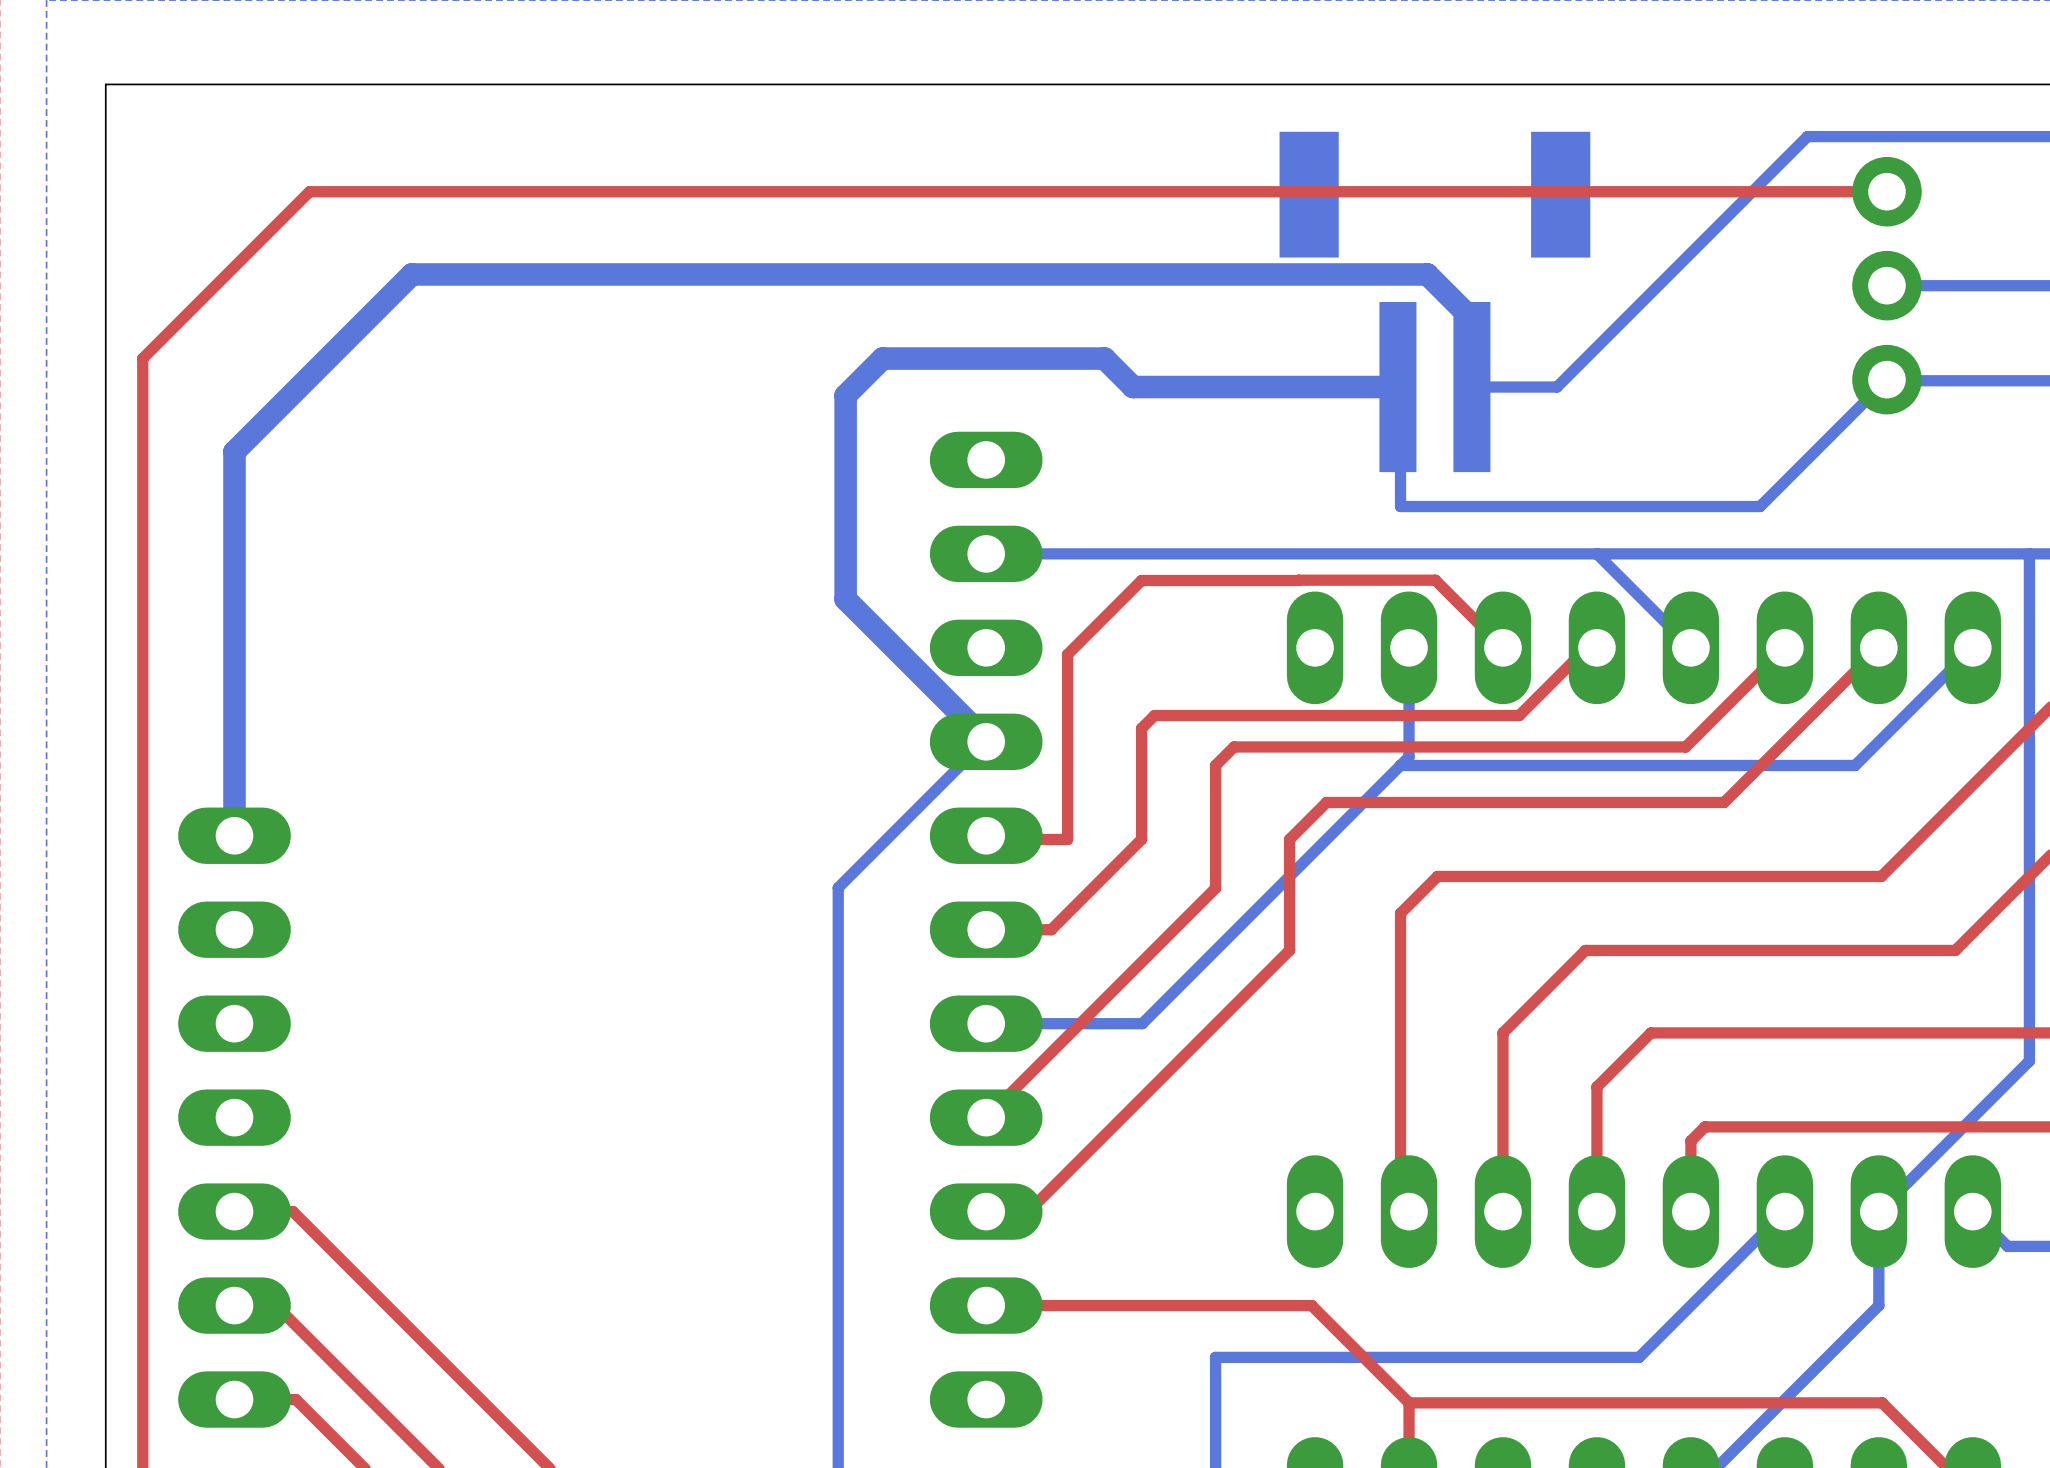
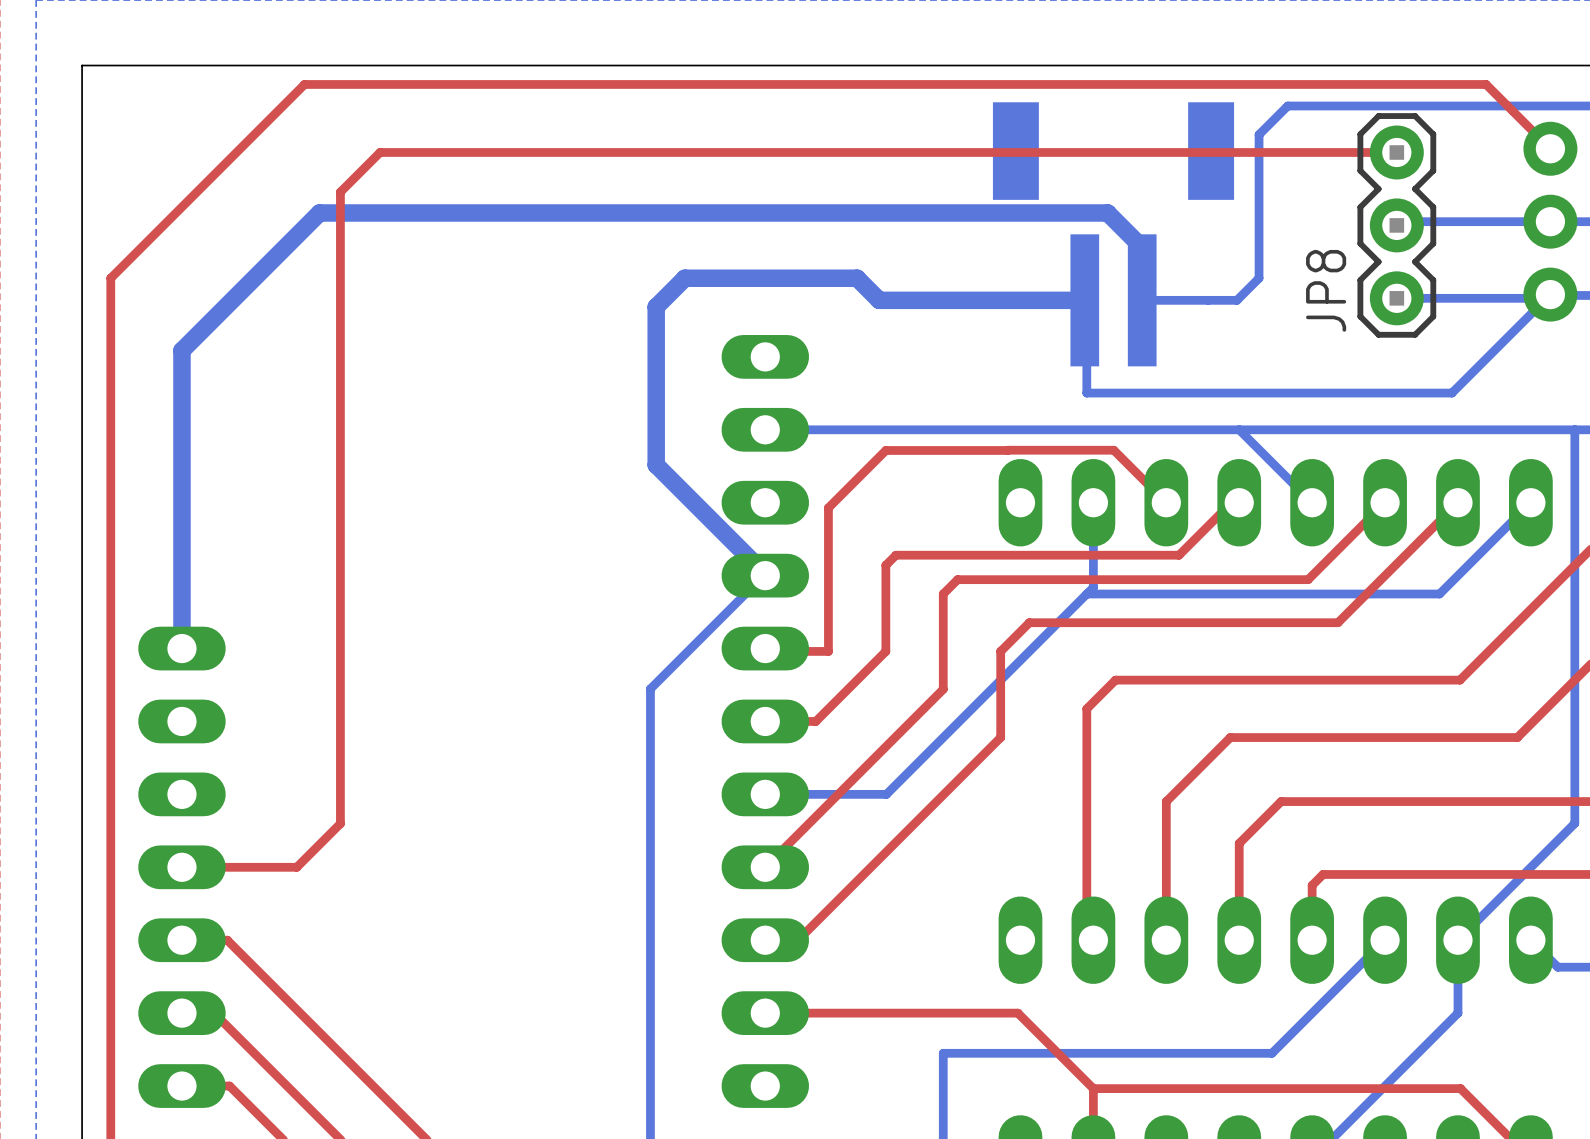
bottom track: (1807, 136) (1557, 387) -> (1402, 105) (1287, 105) (1259, 134) (1259, 278) (1236, 300) (1208, 300)
top track: (309, 191) (1886, 191) -> (240, 148) (304, 84) (1486, 84) (1550, 148)
top track: none -> (1396, 152) (380, 152) (340, 192) (340, 823) (296, 867) (181, 867)
bottom track: none -> (1464, 221) (1400, 221) (1396, 225)
part position: (1886, 285) -> (1550, 221)
JP8: none -> (1396, 225)
bottom track: (1999, 380) (1886, 379) (1760, 506) -> (1396, 298) (1548, 298) (1551, 295) (1550, 294) (1451, 393) (1365, 393)

